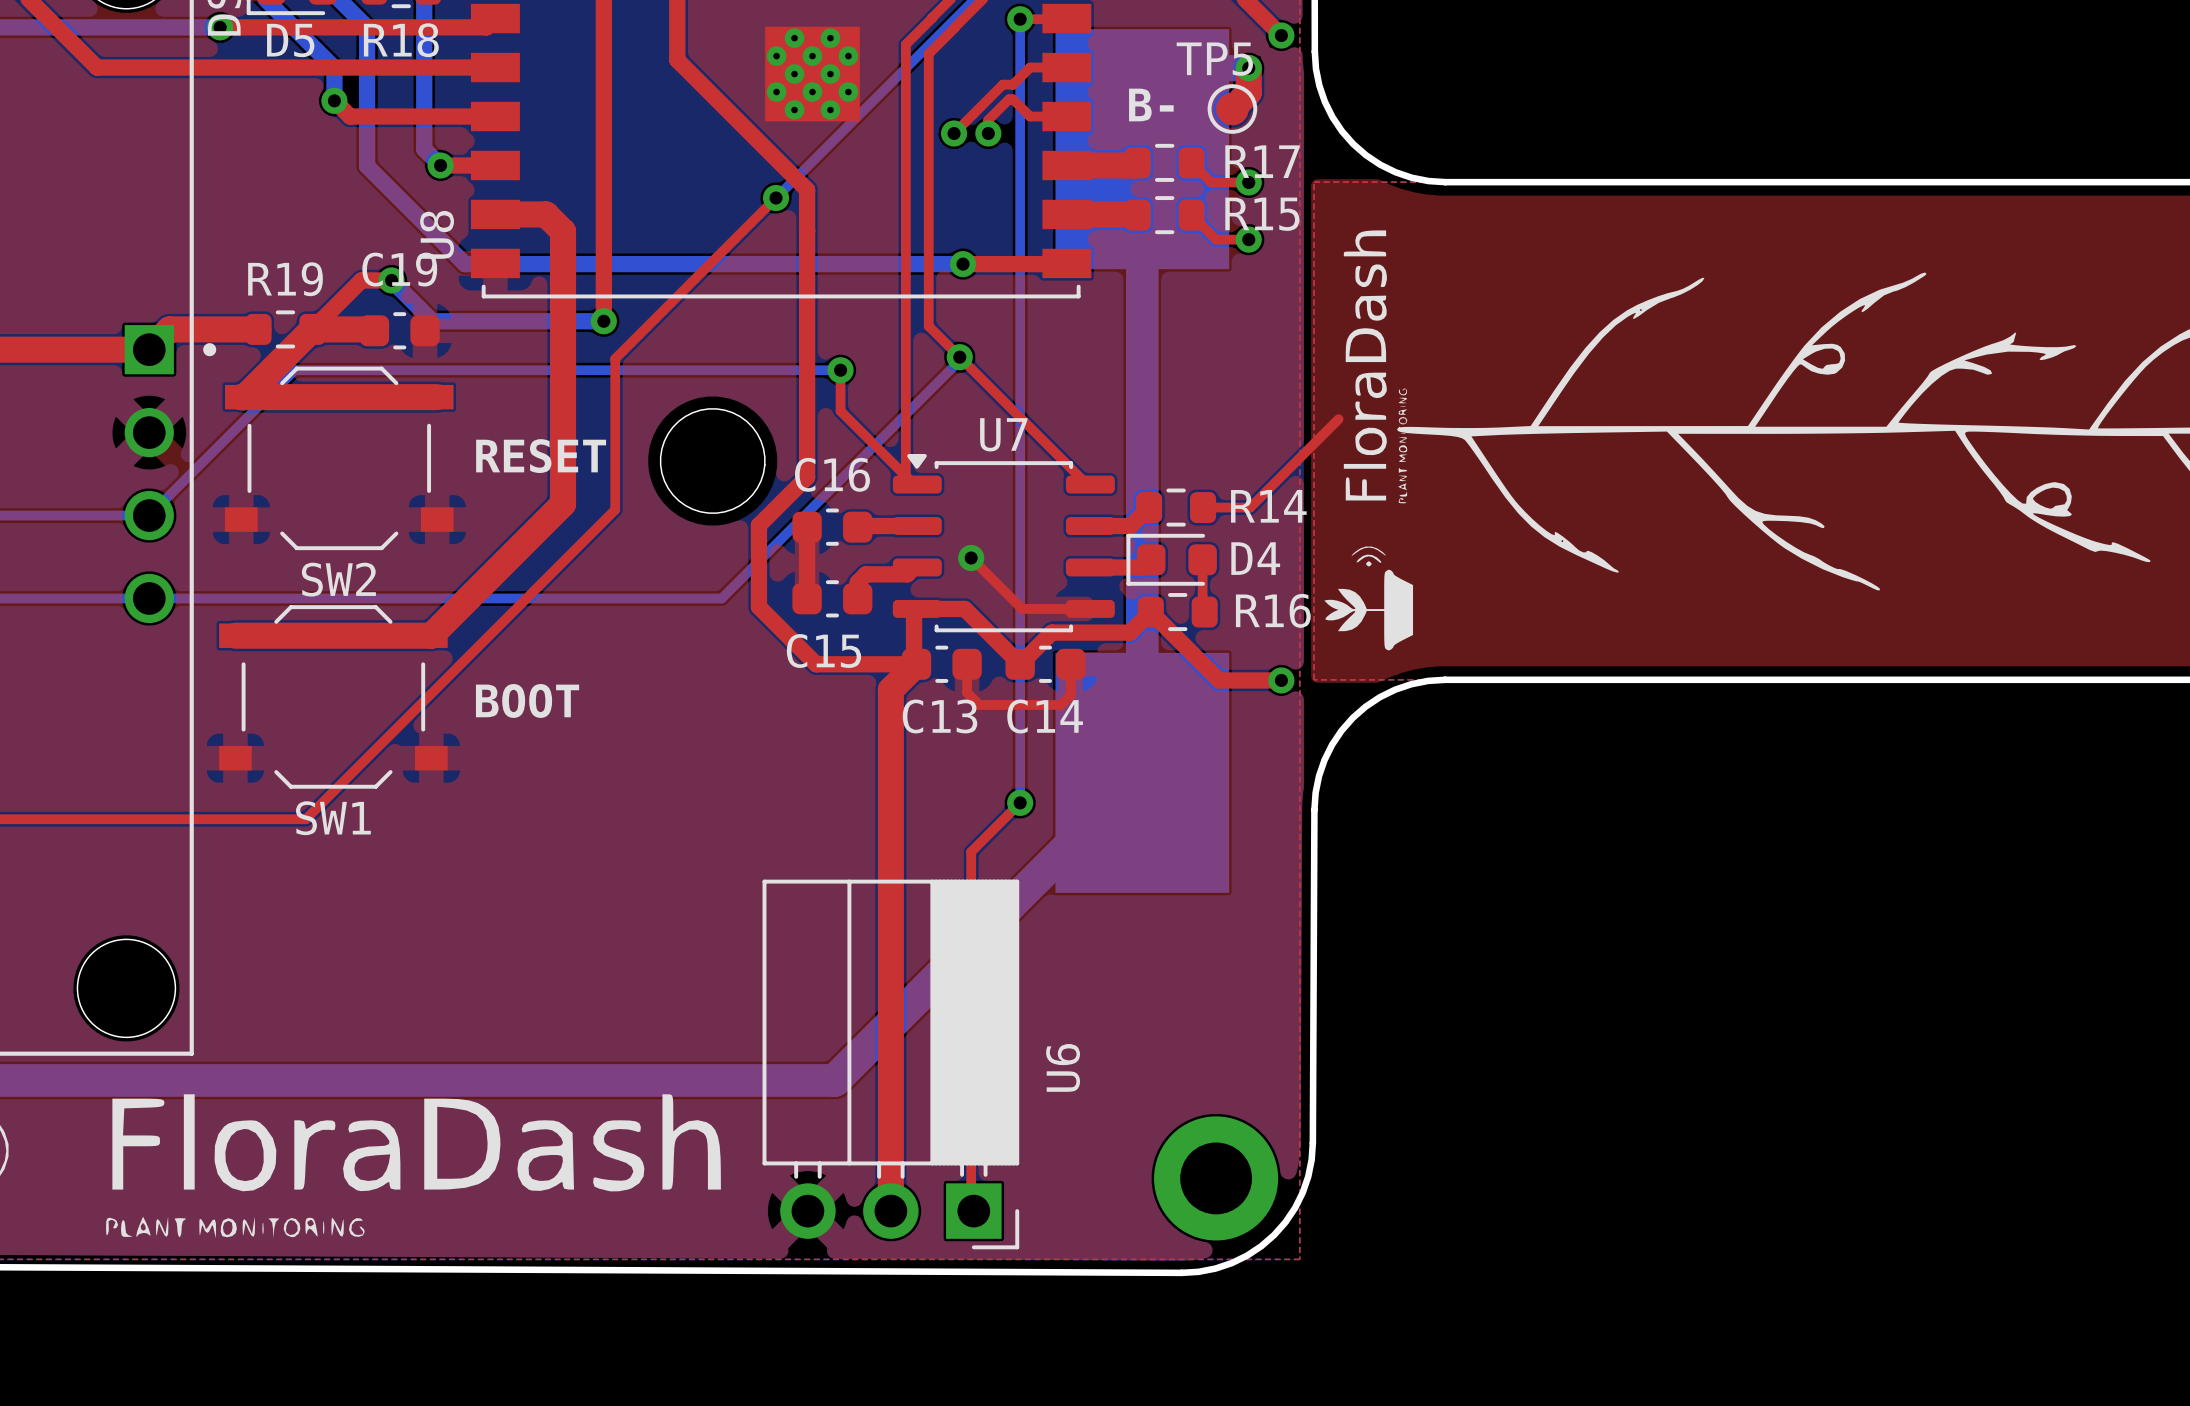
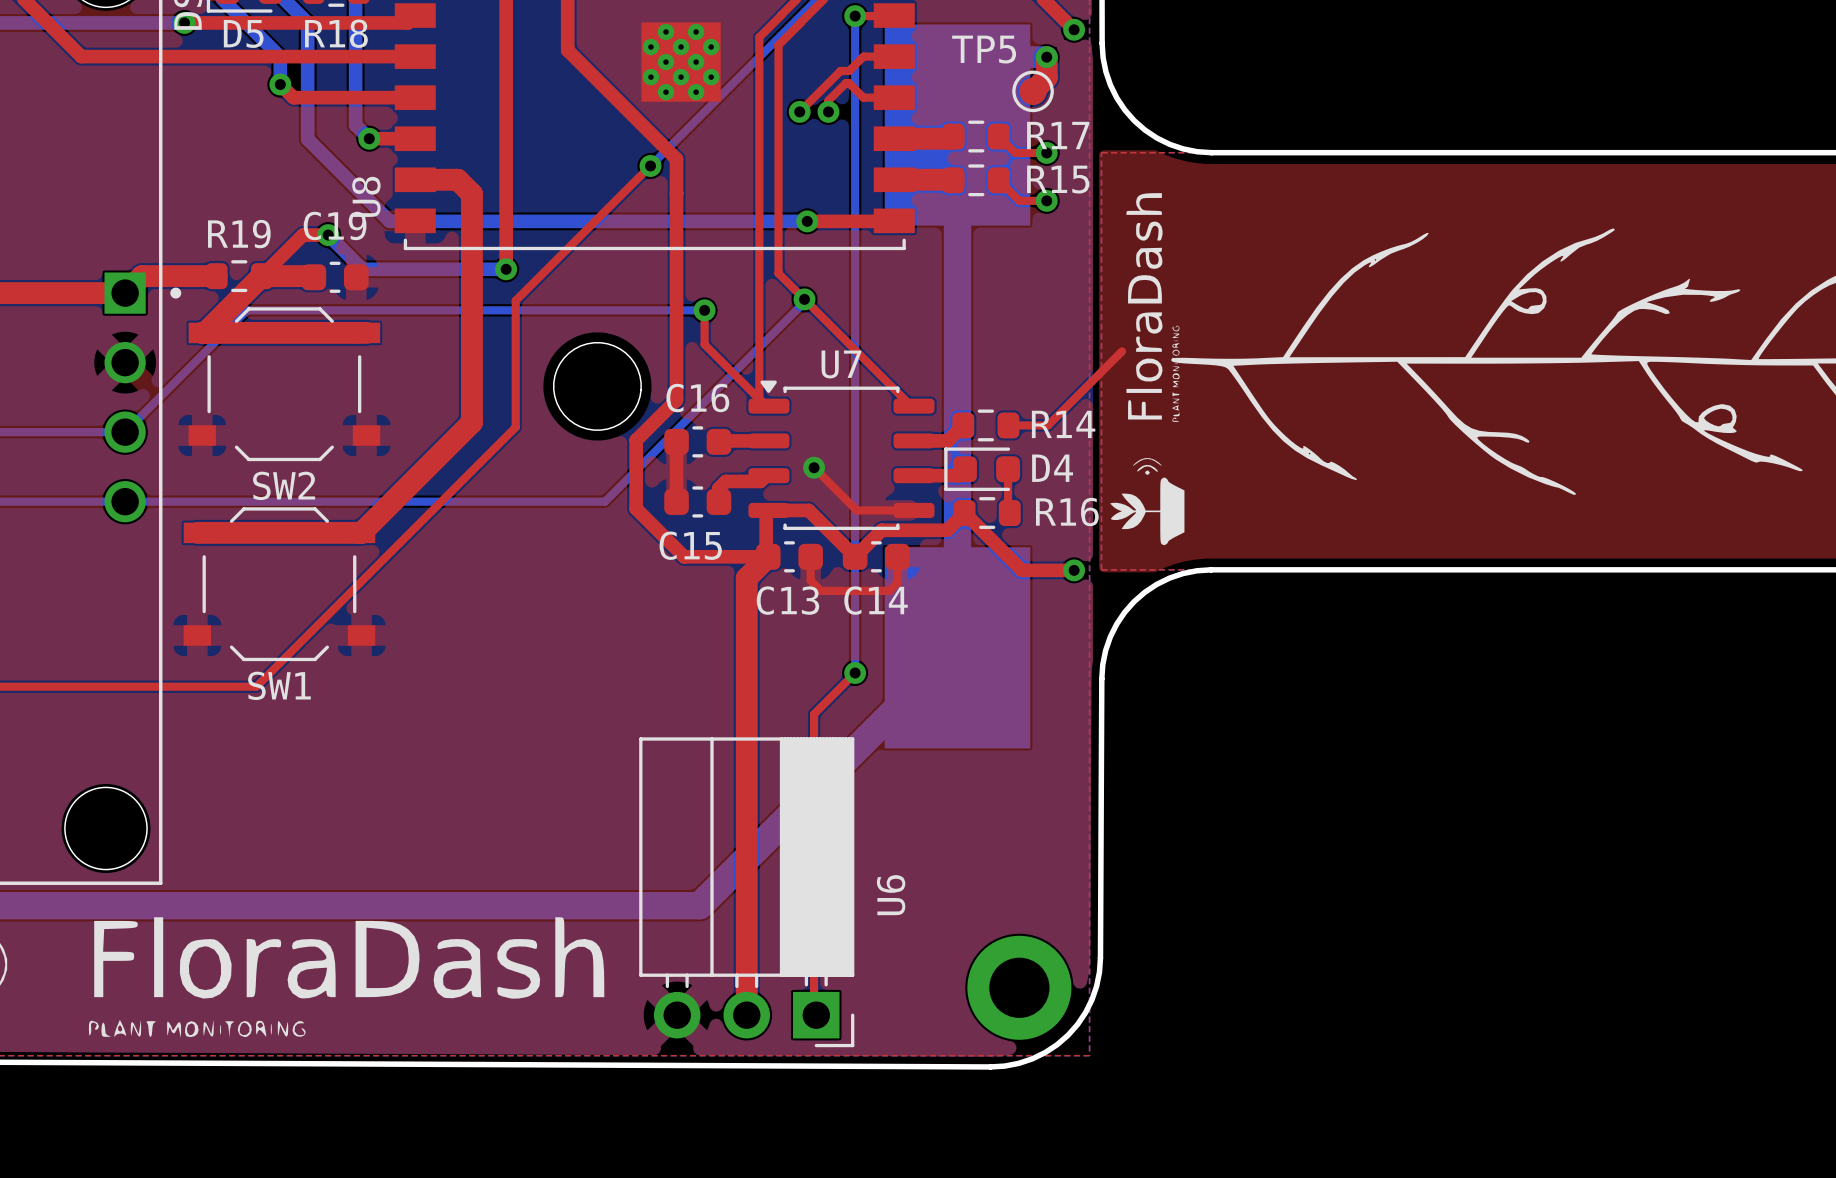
TP5 name position: TP5 (1214, 59) -> TP5 (984, 49)
text: B- (1151, 104) -> none
text: RESET (541, 456) -> none
text: BOOT (527, 700) -> none

